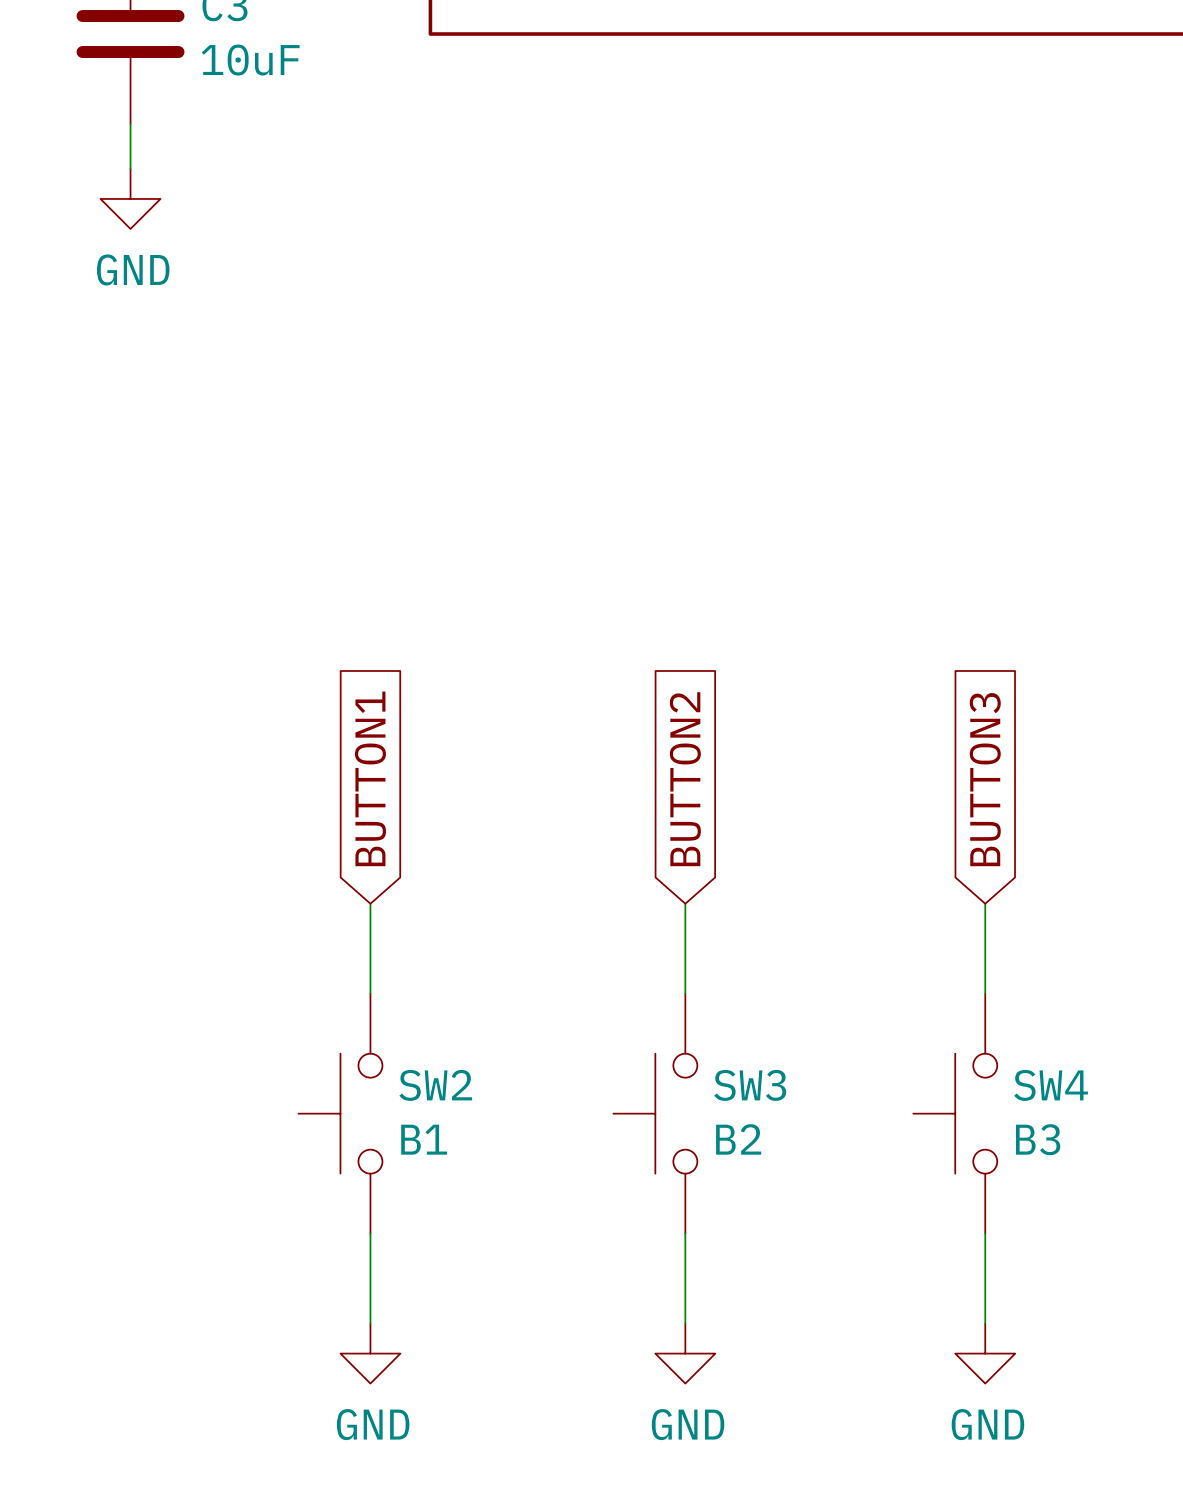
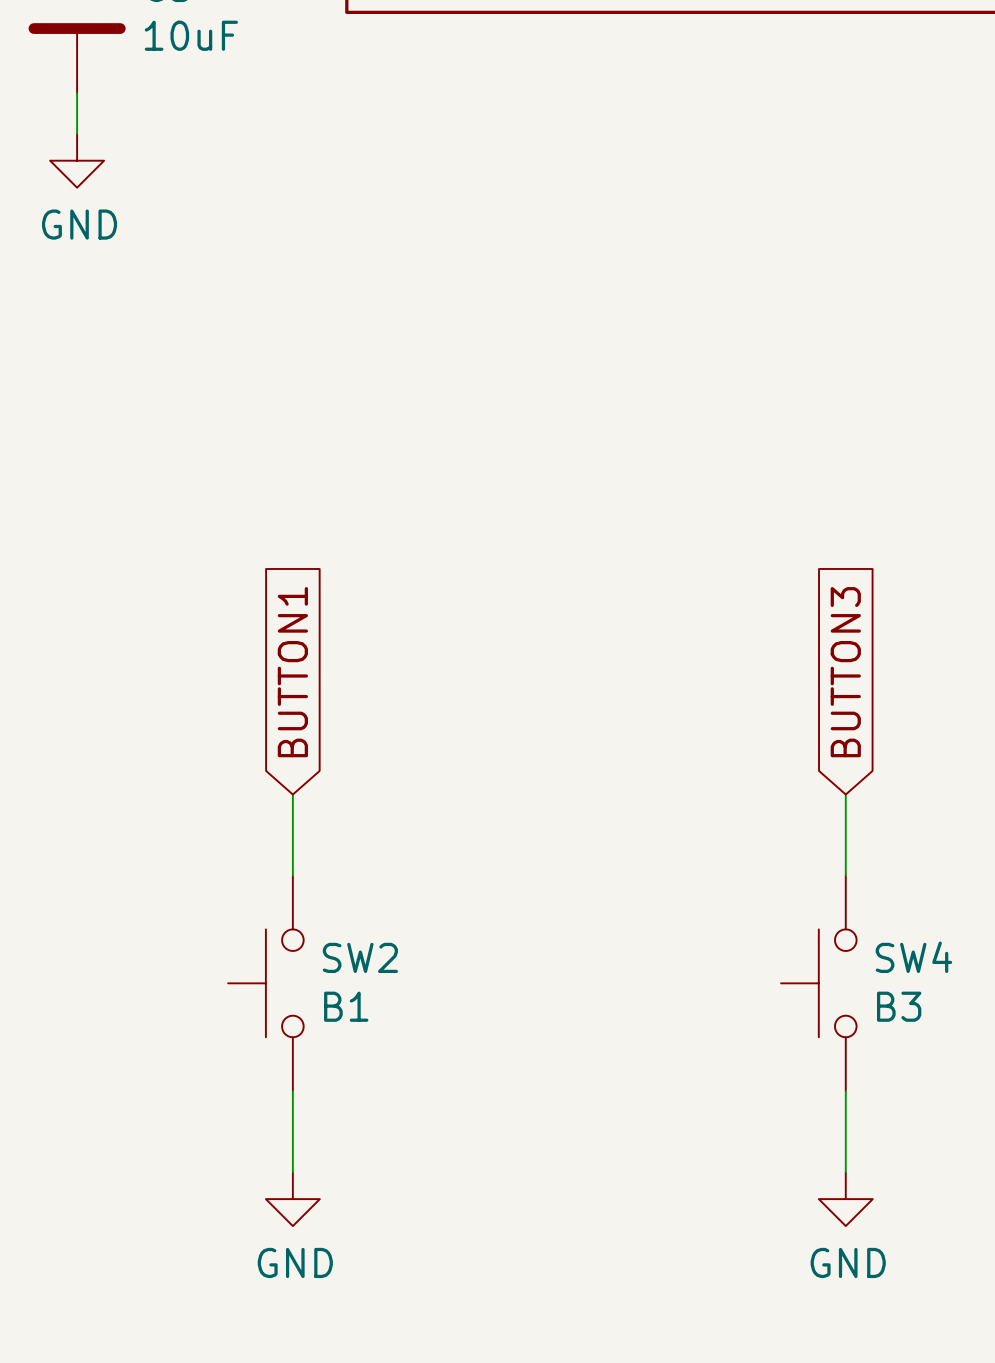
global label: BUTTON2 (685, 779) -> none
wire: (685, 903) (685, 993) -> none
SW3: B2 (655, 1113) -> none
wire: (685, 1233) (685, 1323) -> none
power symbol: GND (685, 1353) -> none

